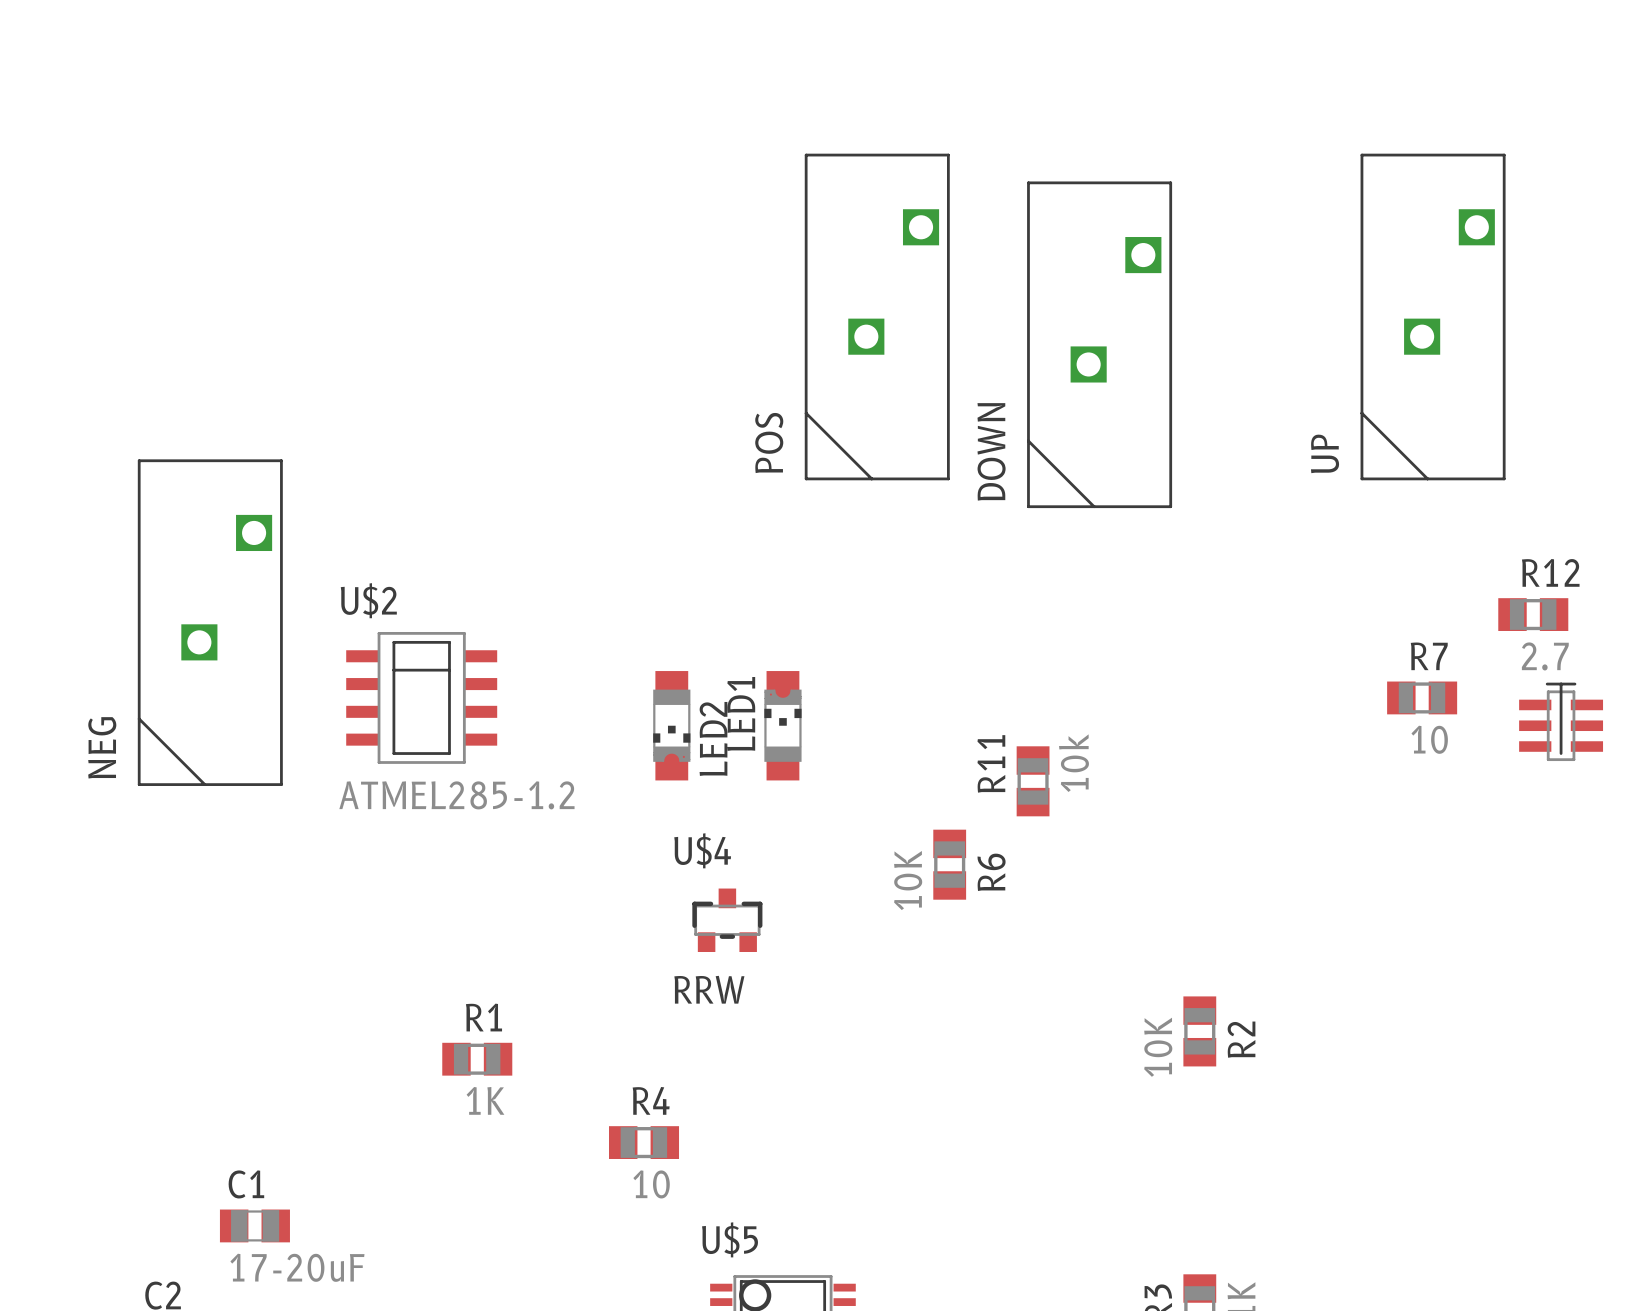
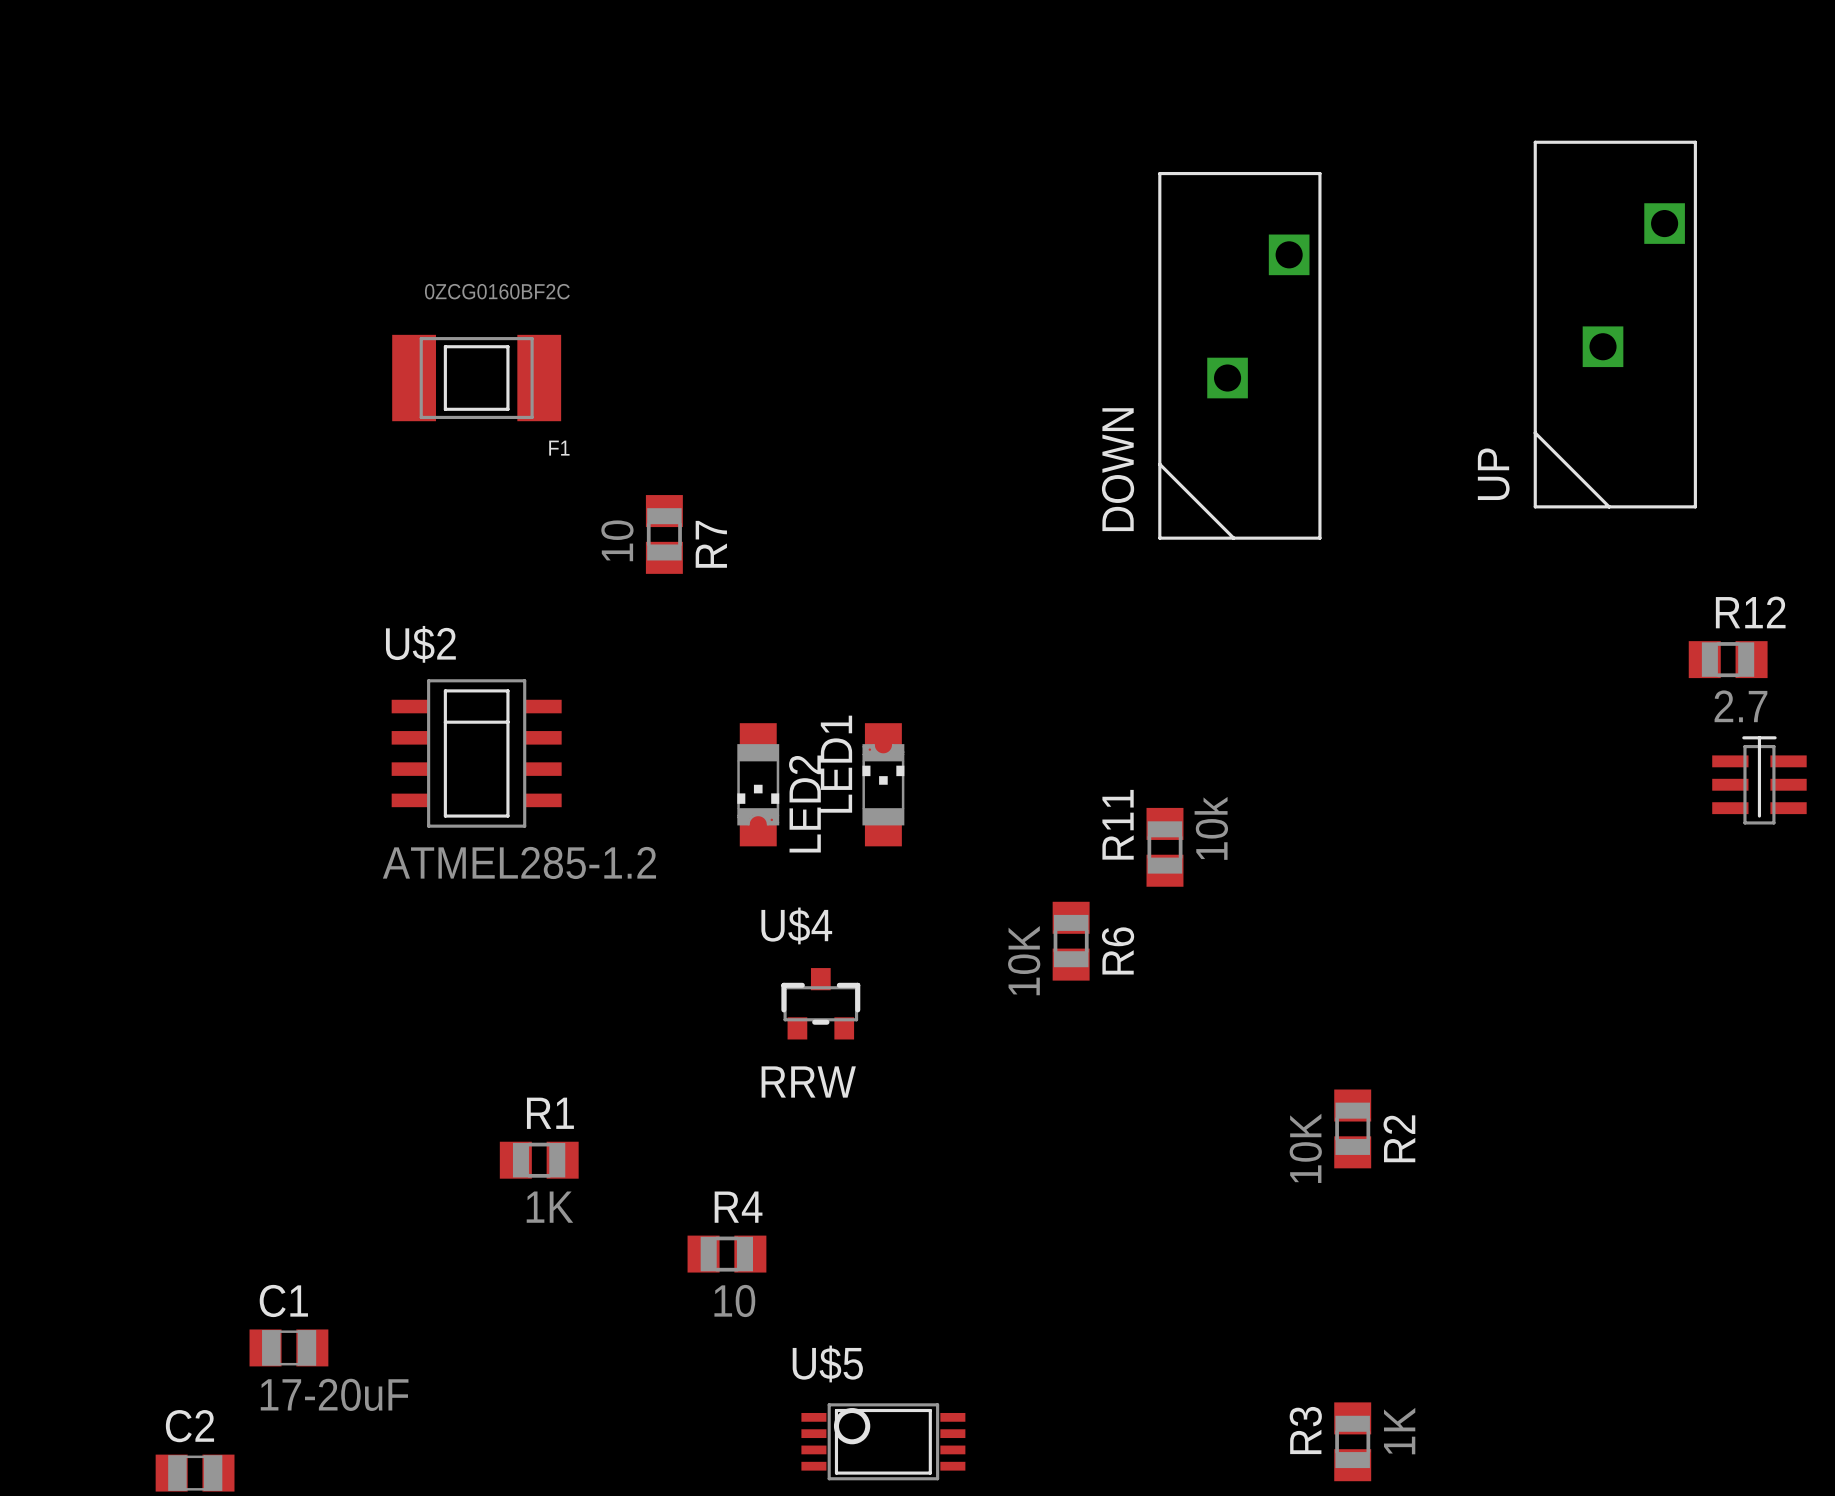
POS: (877, 316) -> none
F1: none -> 0ZCG0160BF2C (476, 378)
NEG: (210, 622) -> none
R7 rotation: 0° (1422, 697) -> 90° clockwise (664, 534)
R7 position: (1422, 697) -> (664, 534)

